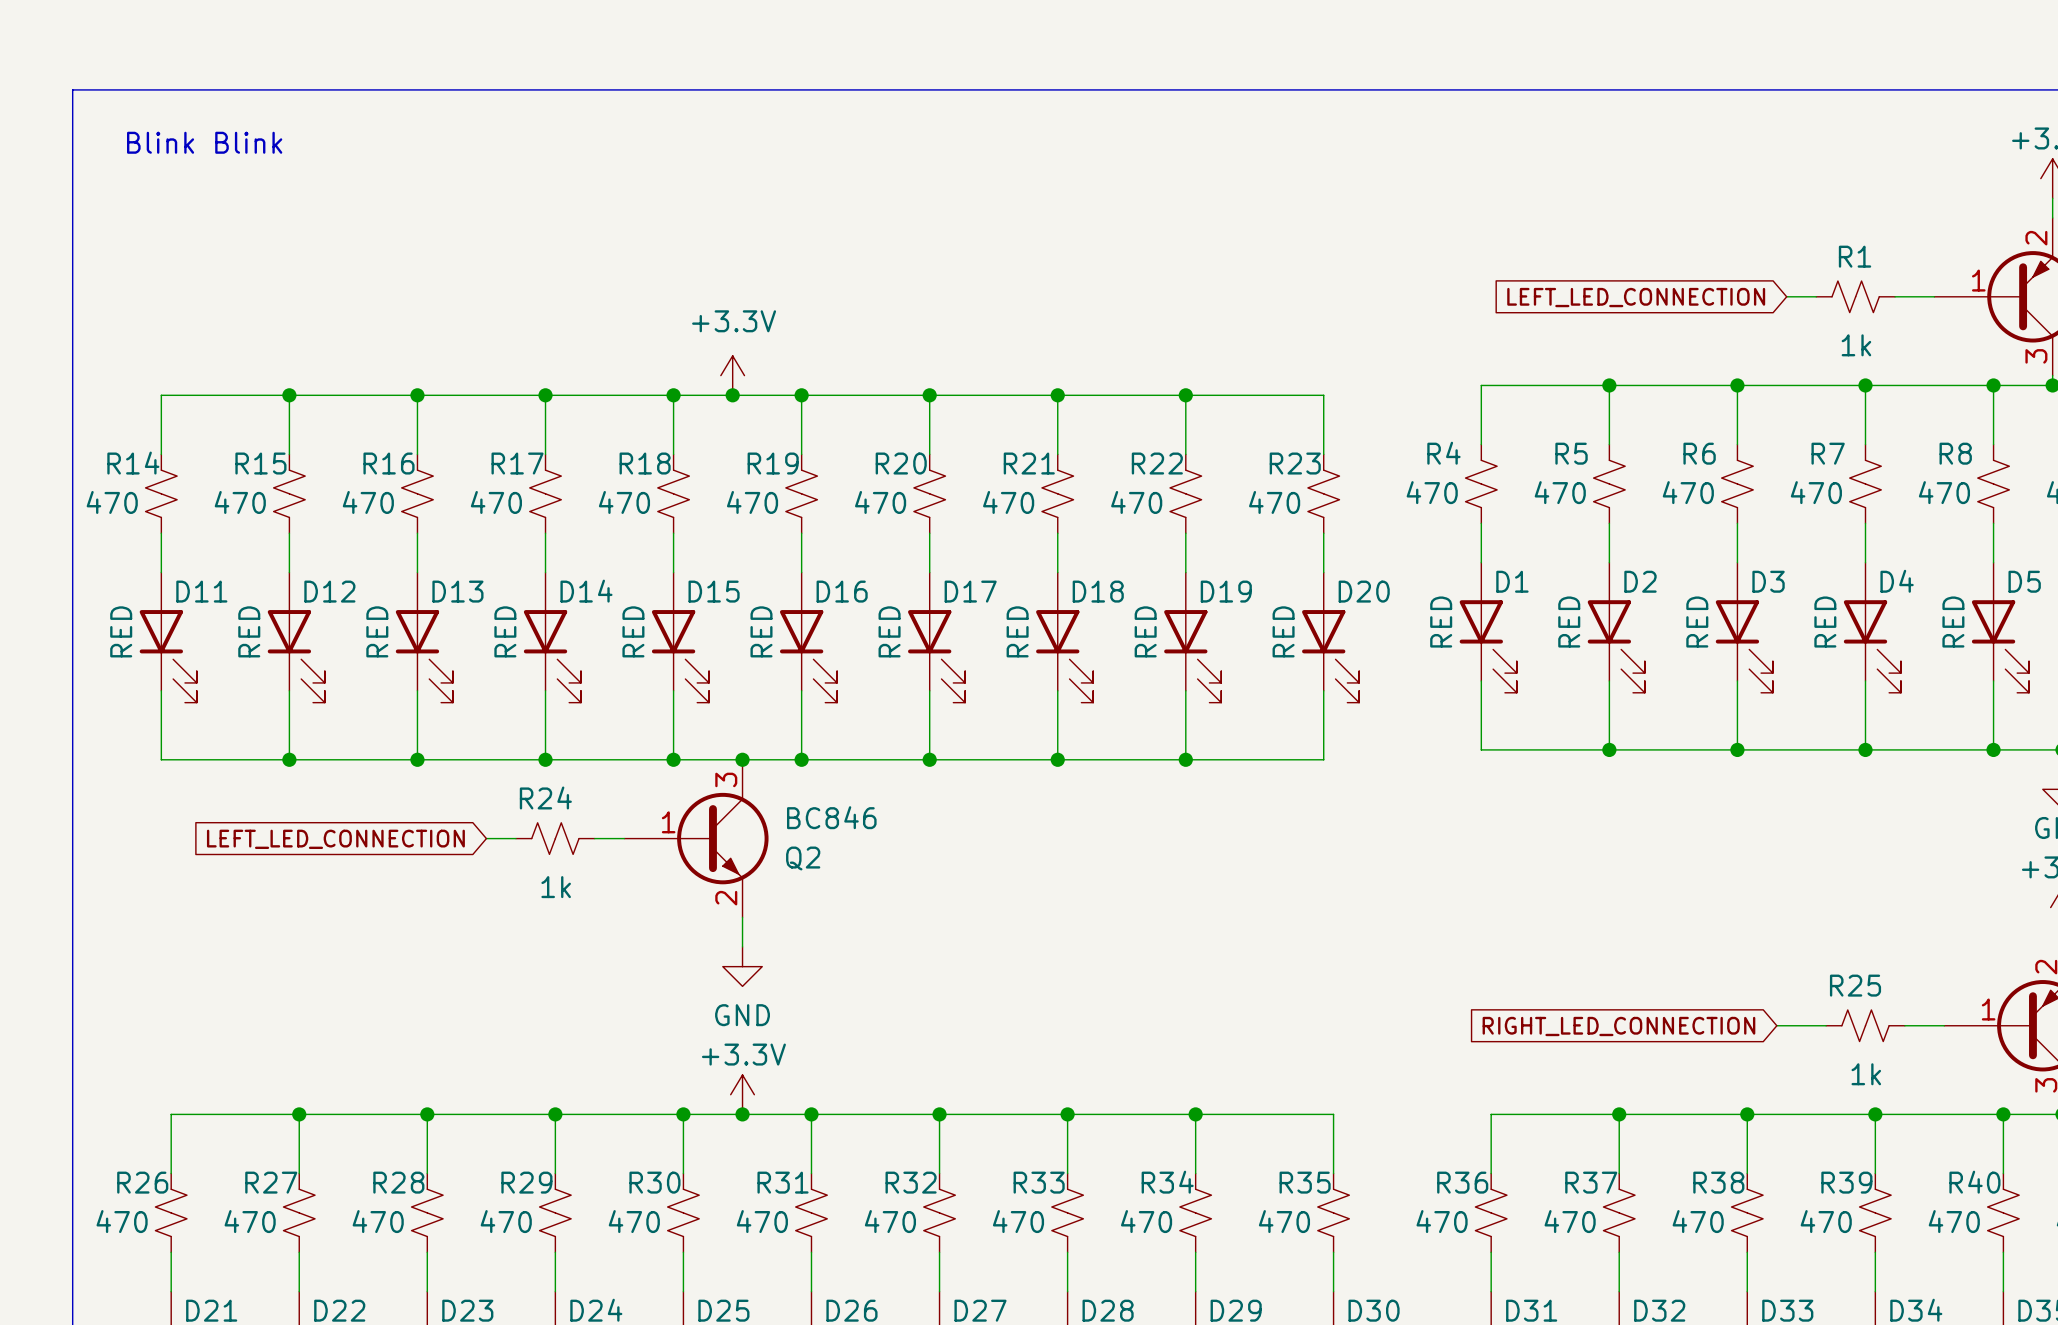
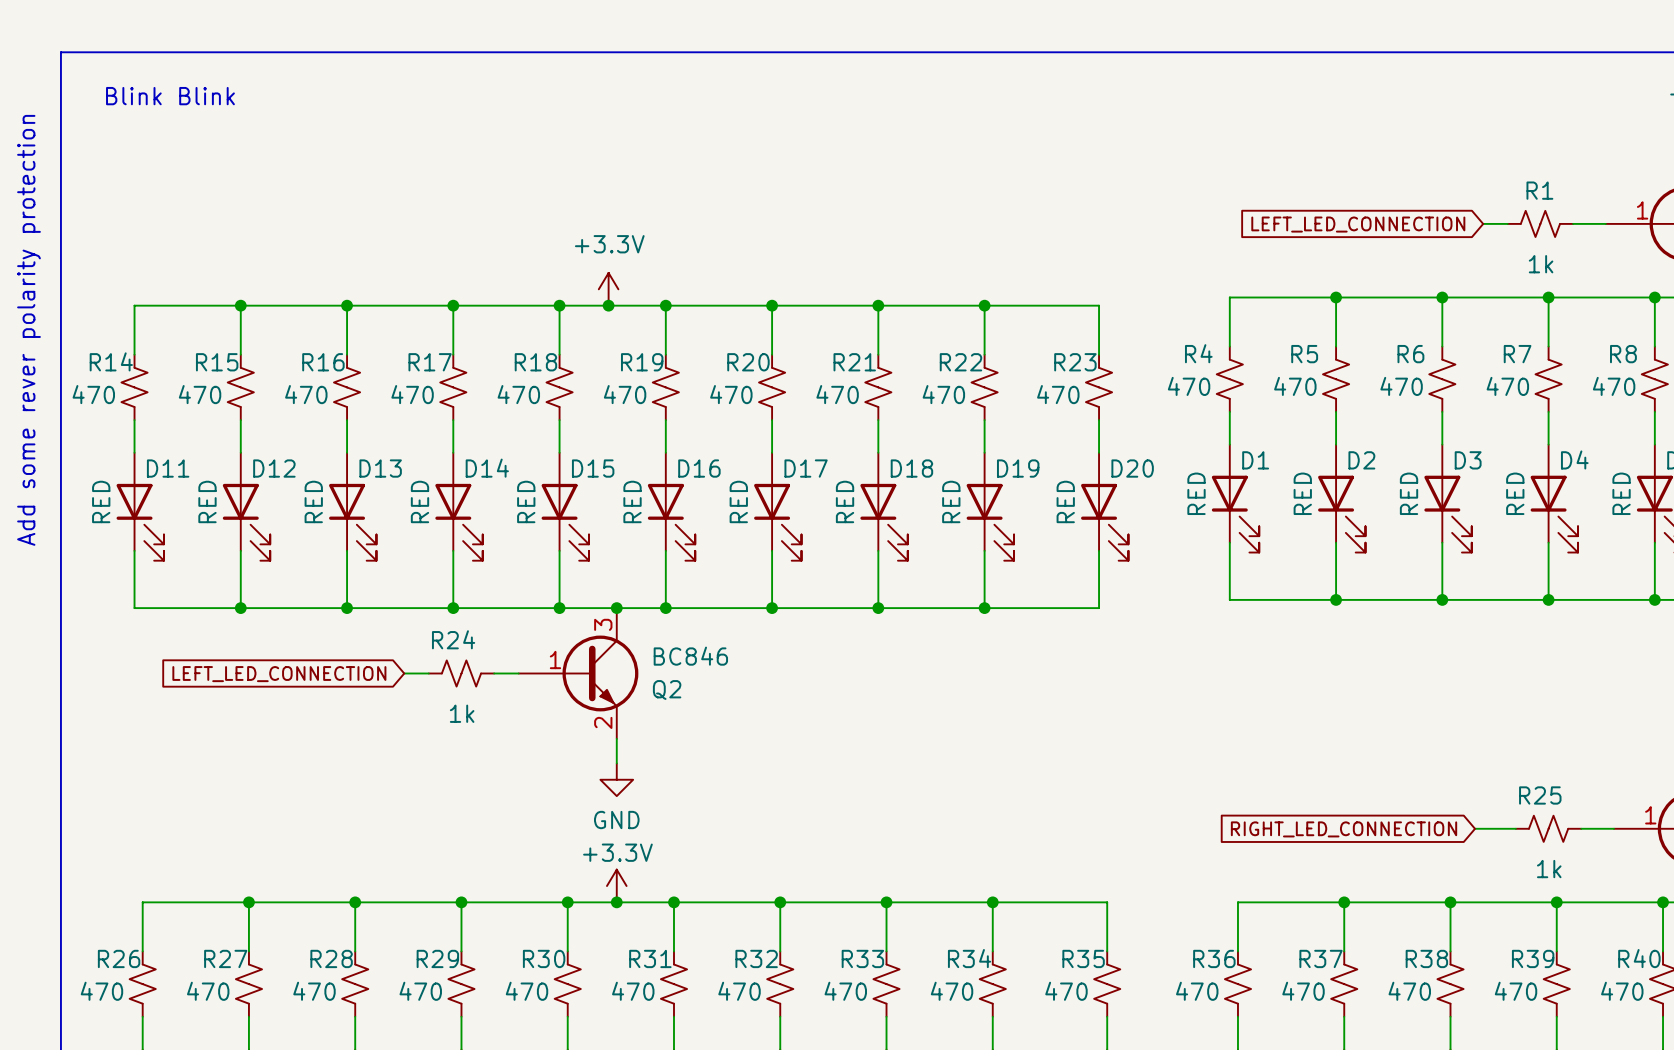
text: none -> Add some rever polarity protection (28, 330)

